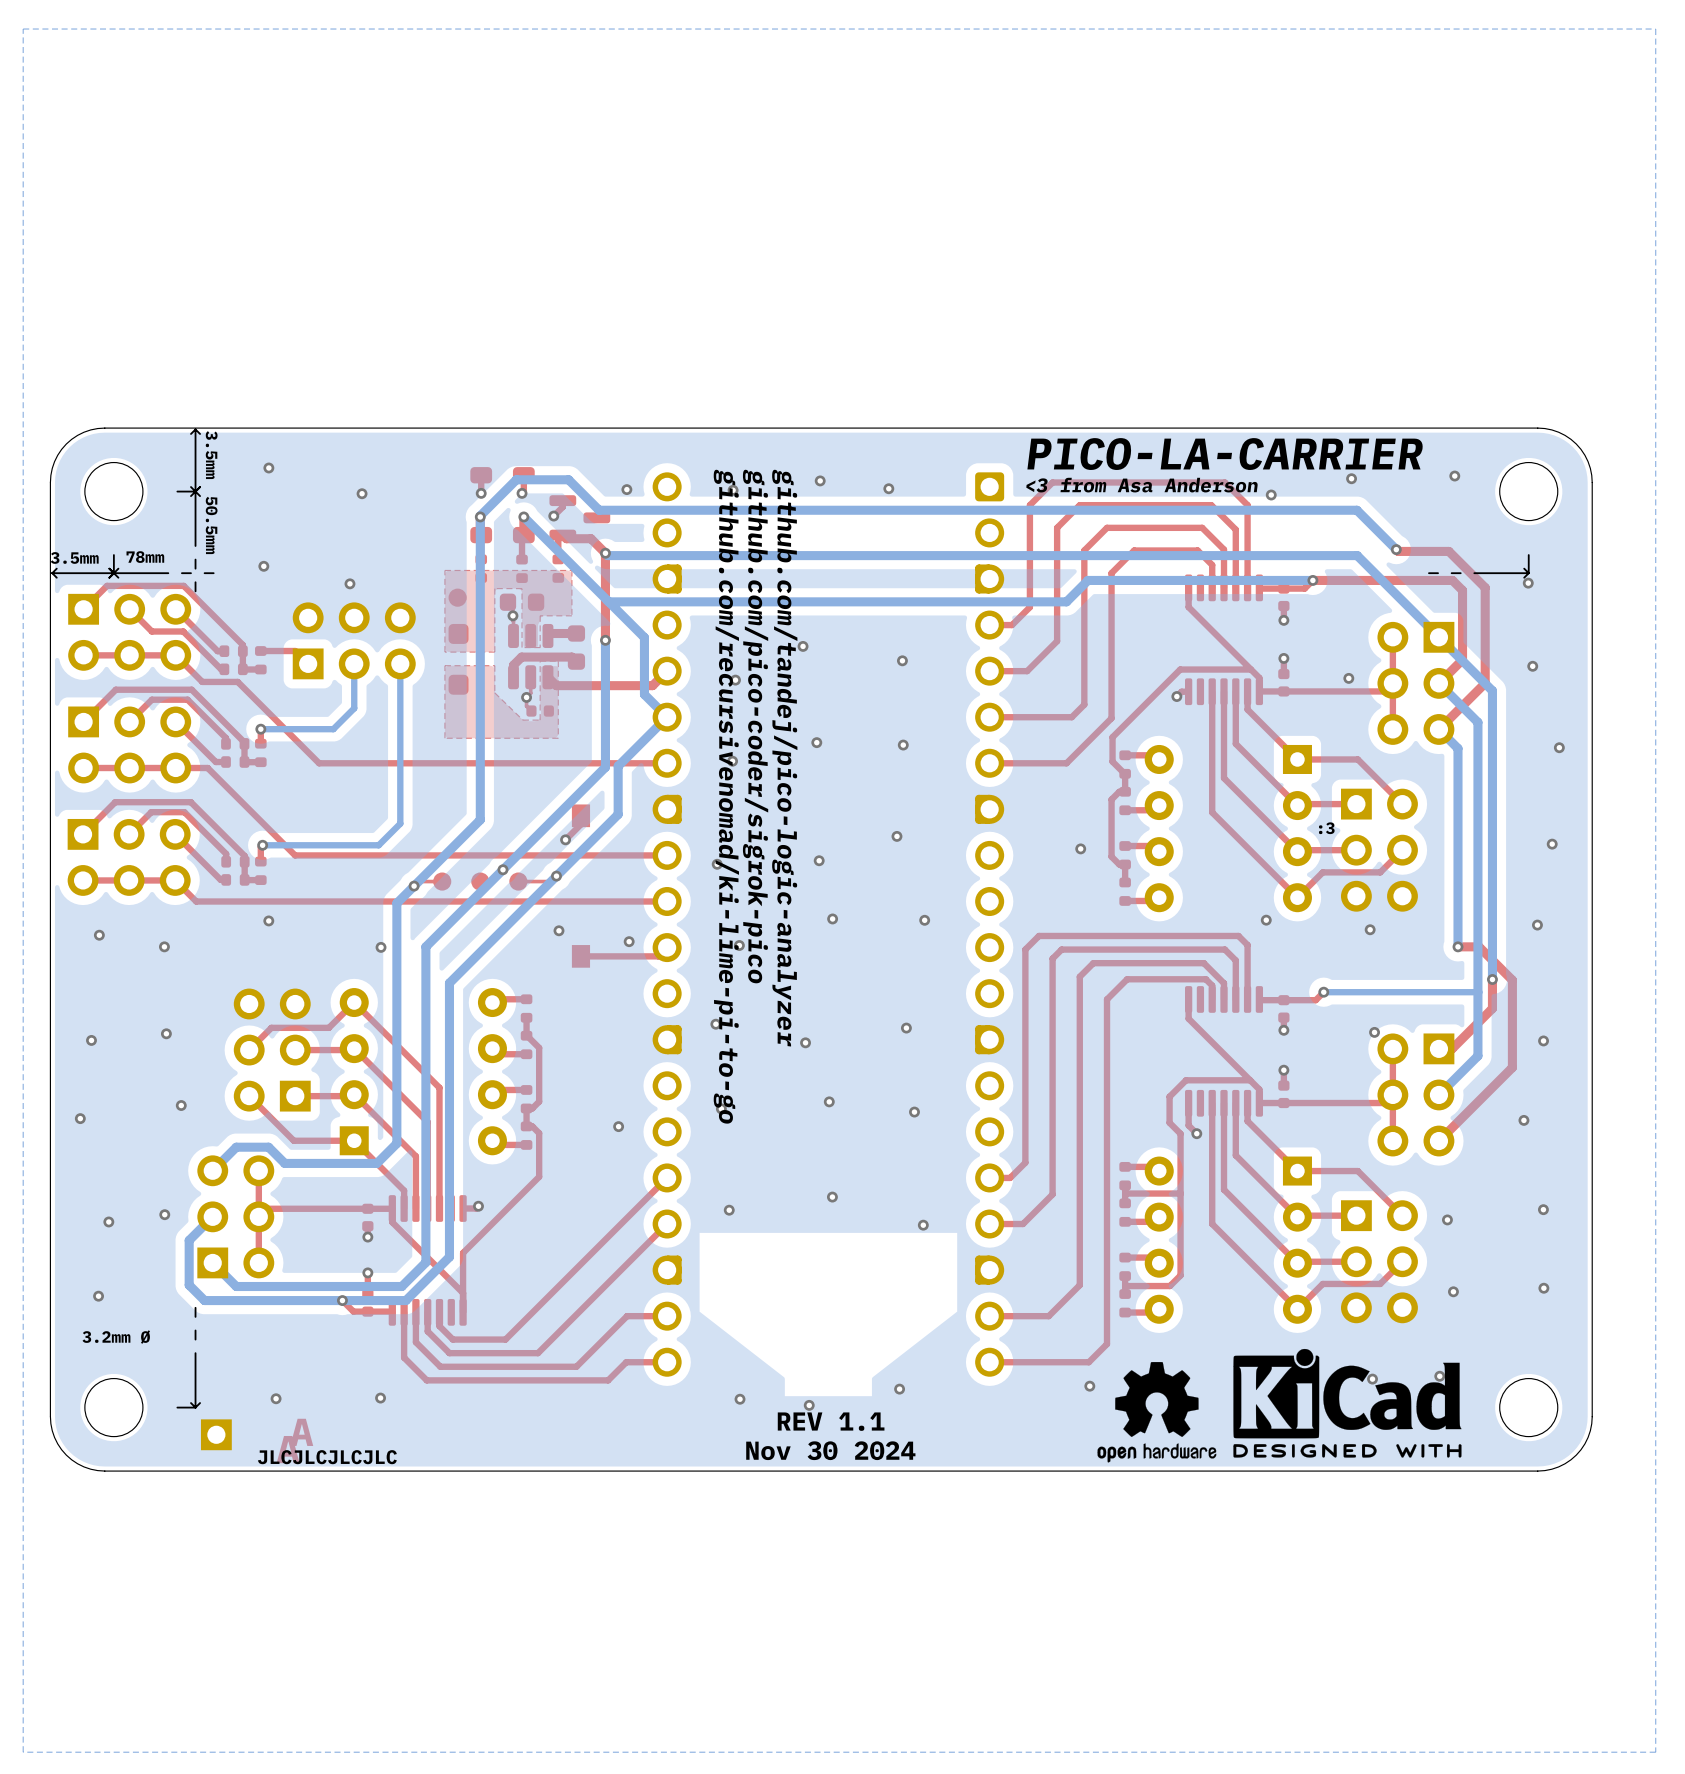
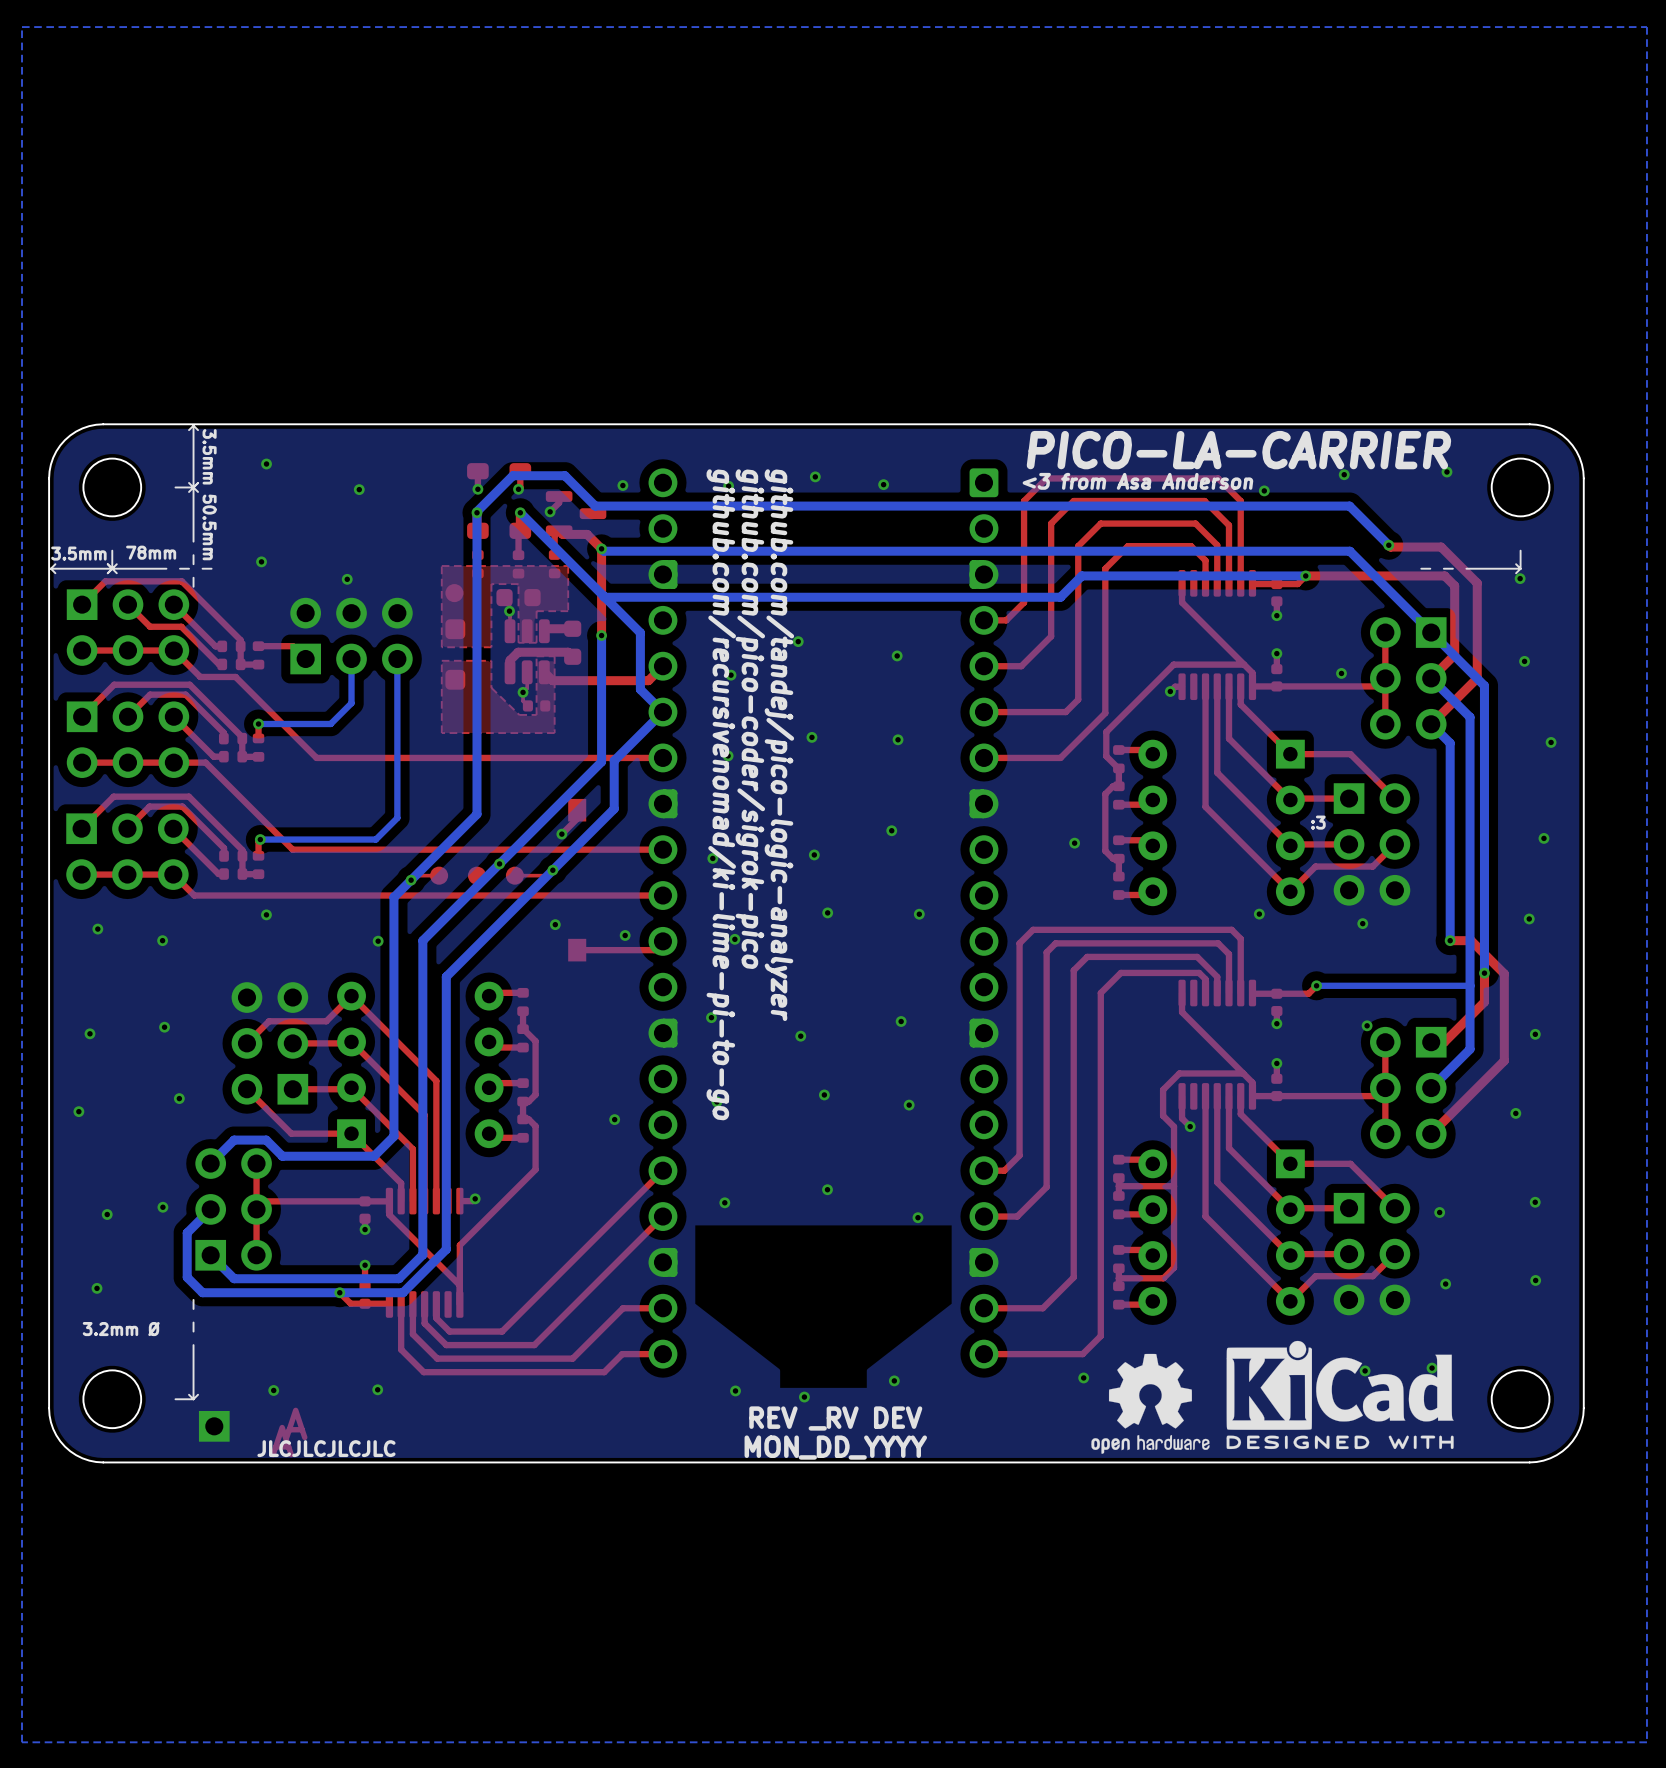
text: REV 1.1 (831, 1421) -> REV _RV DEV (835, 1418)
text: Nov 30 2024 (830, 1450) -> MON_DD_YYYY (835, 1447)

